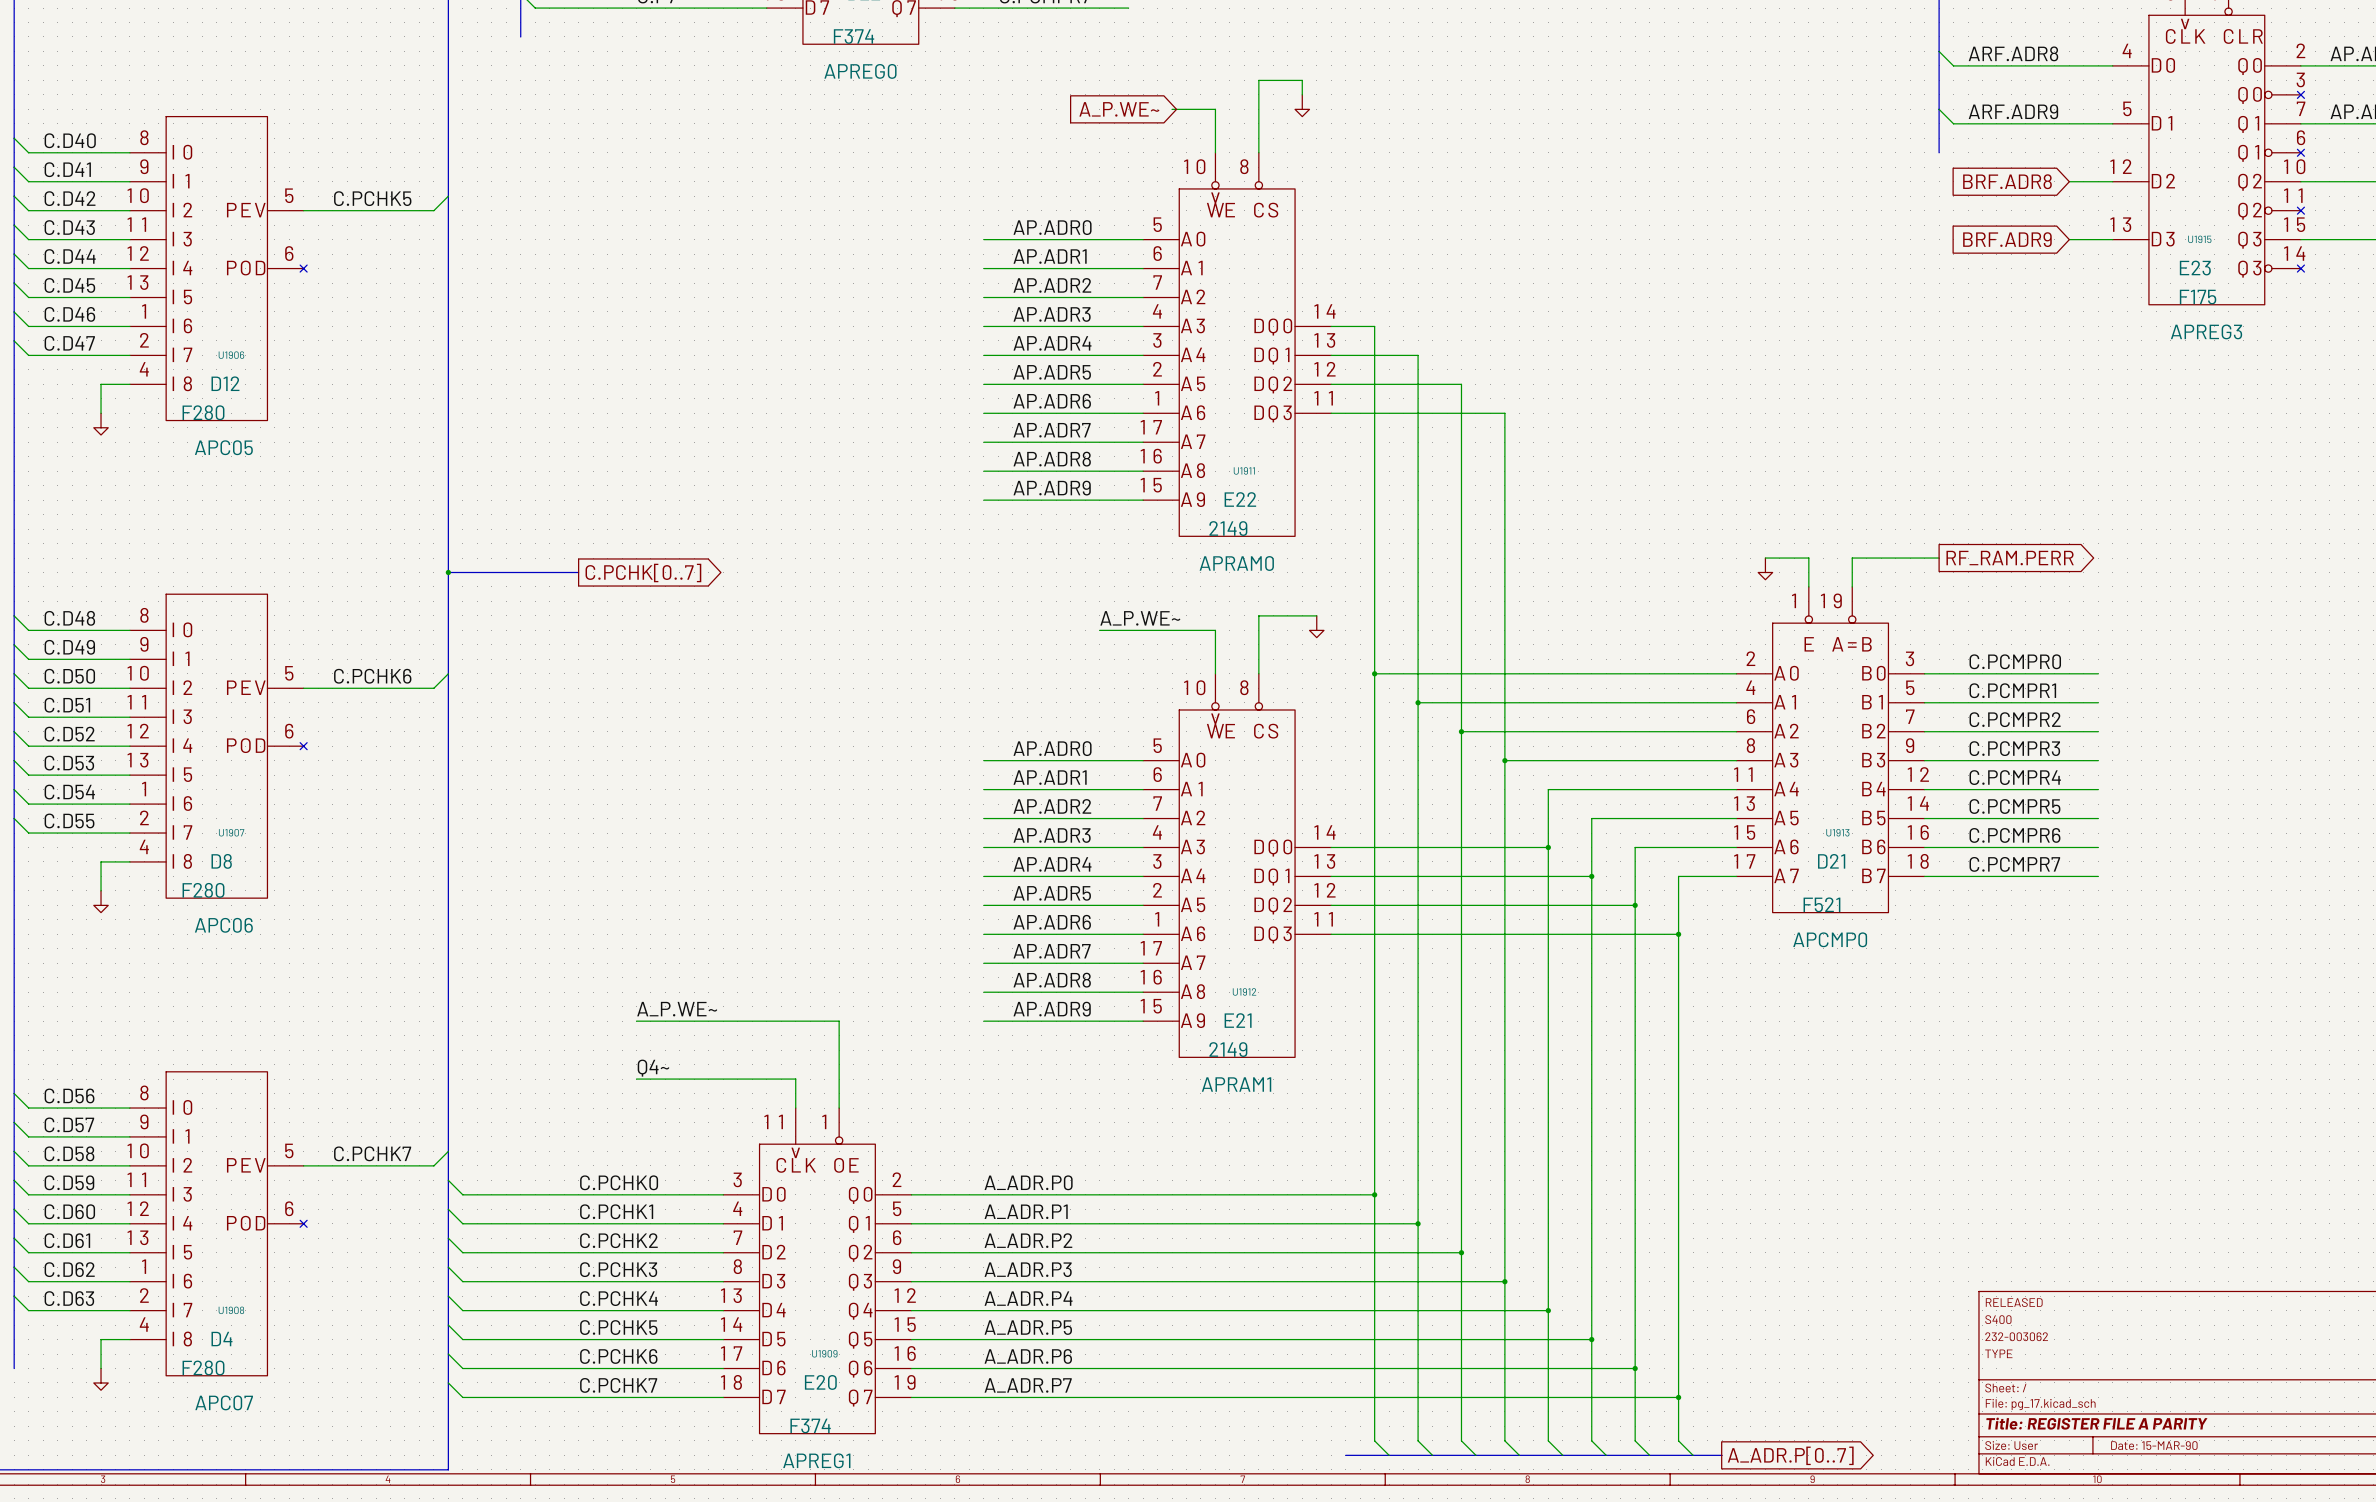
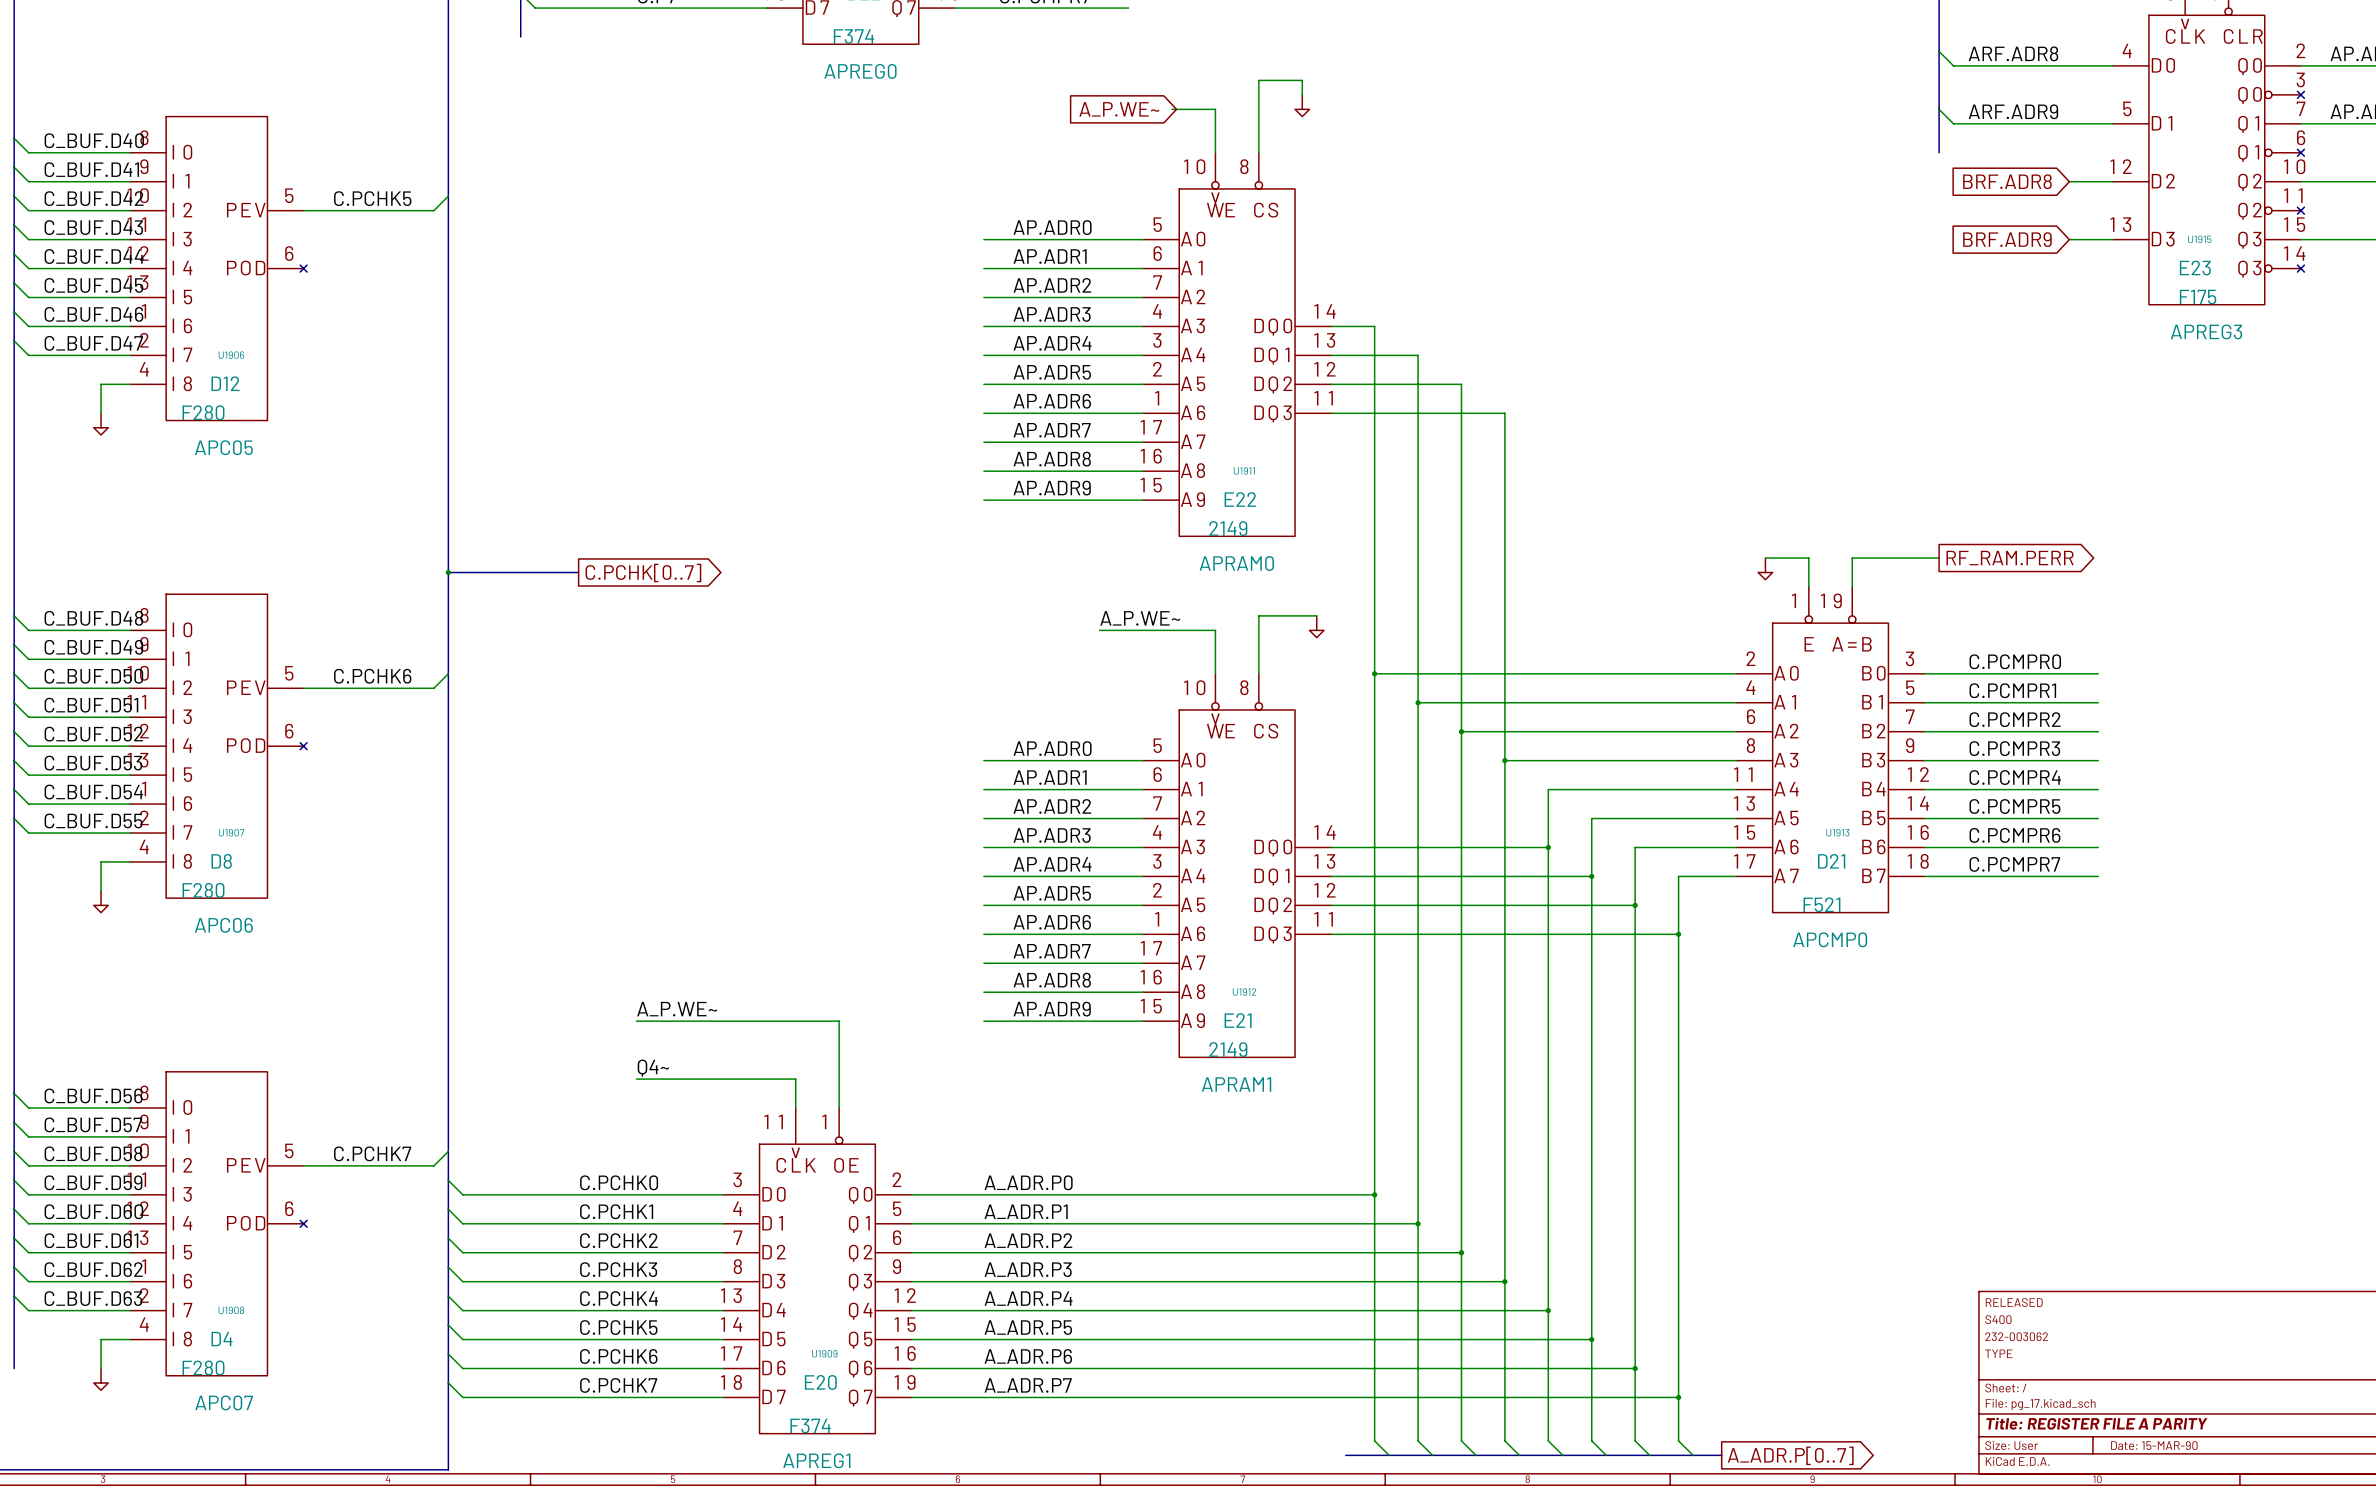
label: C.D40 (70, 140) -> C_BUF.D40 (94, 140)
label: C.D41 (67, 169) -> C_BUF.D41 (91, 169)
label: C.D42 (70, 198) -> C_BUF.D42 (94, 198)
label: C.D43 (69, 227) -> C_BUF.D43 (93, 227)
label: C.D44 (70, 256) -> C_BUF.D44 (94, 256)
label: C.D45 (69, 285) -> C_BUF.D45 (93, 285)
label: C.D46 (69, 314) -> C_BUF.D46 (93, 314)
label: C.D47 (69, 343) -> C_BUF.D47 (93, 343)
label: C.D48 (69, 618) -> C_BUF.D48 (93, 618)
label: C.D49 (69, 647) -> C_BUF.D49 (93, 647)
label: C.D50 (69, 676) -> C_BUF.D50 (93, 676)
label: C.D51 (67, 705) -> C_BUF.D51 (91, 705)
label: C.D52 (69, 734) -> C_BUF.D52 (93, 734)
label: C.D53 (69, 763) -> C_BUF.D53 (93, 763)
label: C.D54 (69, 792) -> C_BUF.D54 (93, 792)
label: C.D55 (69, 820) -> C_BUF.D55 (93, 820)
label: C.D56 (69, 1095) -> C_BUF.D56 (93, 1095)
label: C.D57 (69, 1124) -> C_BUF.D57 (93, 1124)
label: C.D58 (69, 1153) -> C_BUF.D58 (93, 1153)
label: C.D59 (69, 1182) -> C_BUF.D59 (93, 1182)
label: C.D60 (69, 1211) -> C_BUF.D60 (93, 1211)
label: C.D61 (67, 1240) -> C_BUF.D61 (91, 1240)
label: C.D62 (69, 1269) -> C_BUF.D62 (93, 1269)
label: C.D63 (69, 1298) -> C_BUF.D63 (93, 1298)

